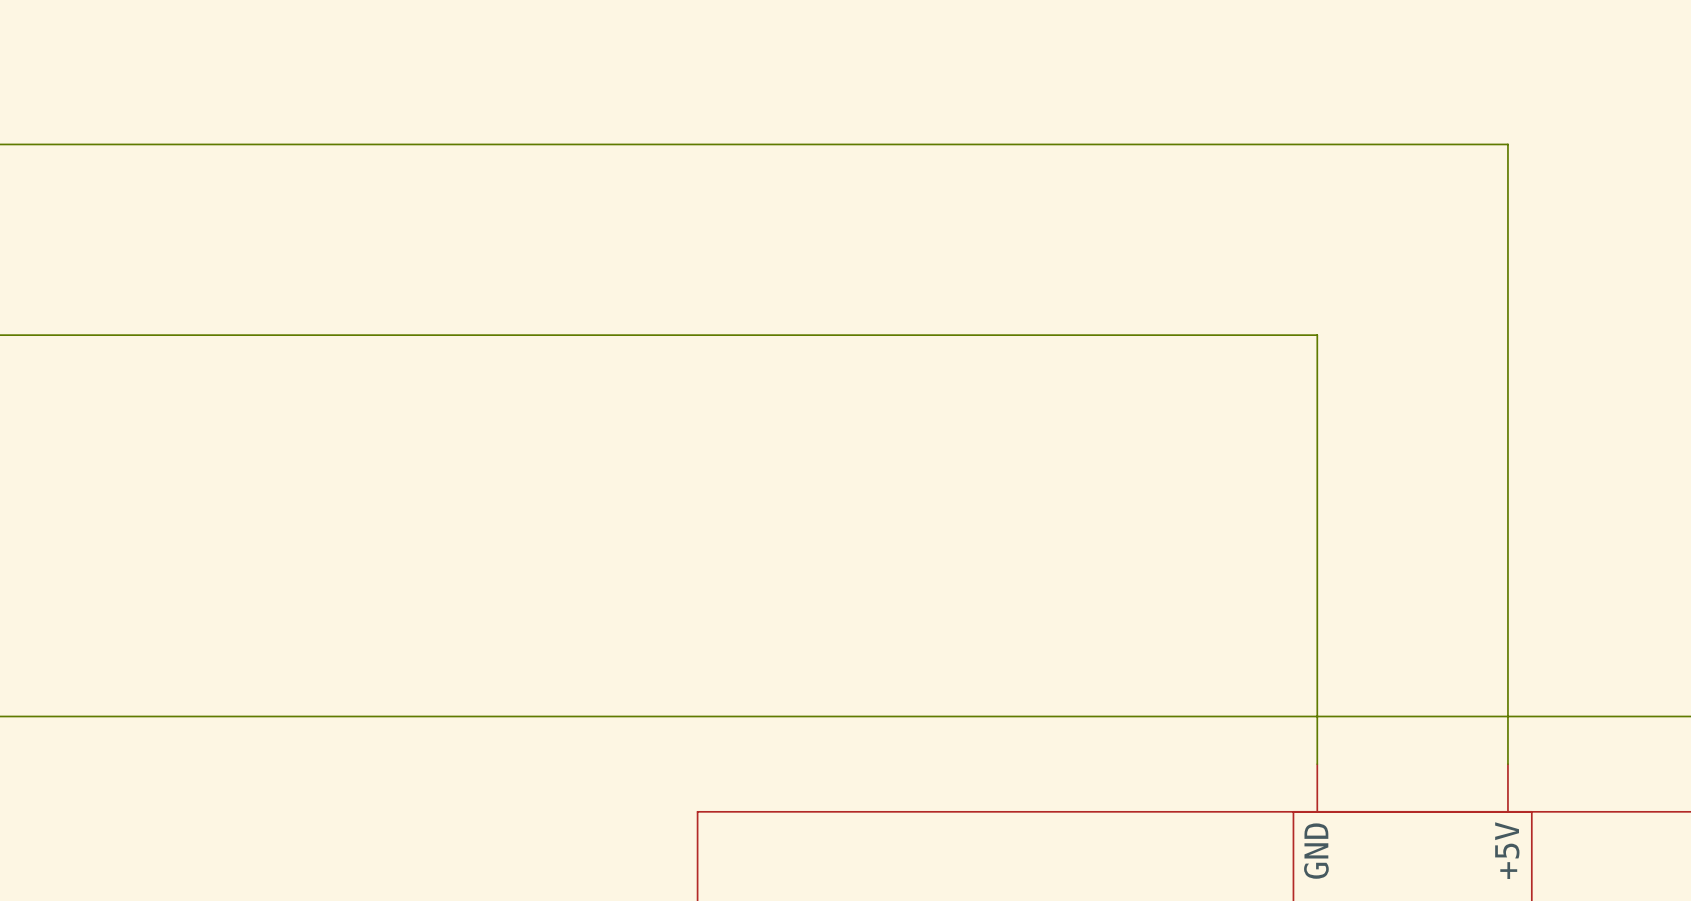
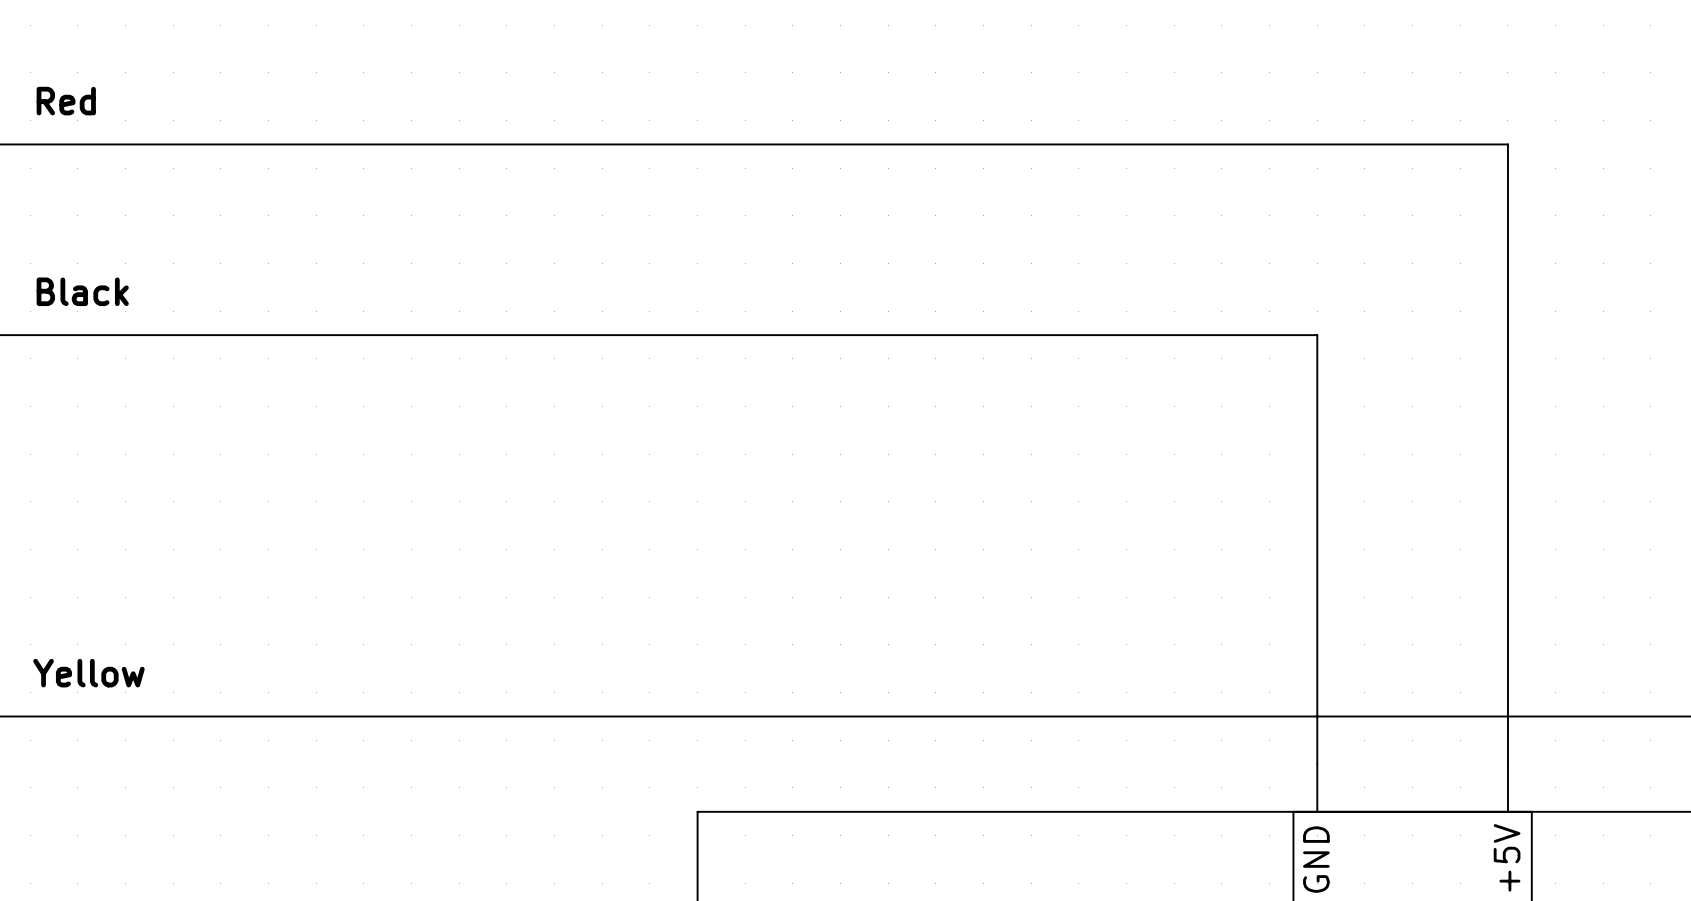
text: none -> Red (66, 101)
text: none -> Black (82, 291)
text: none -> Yellow (88, 673)

